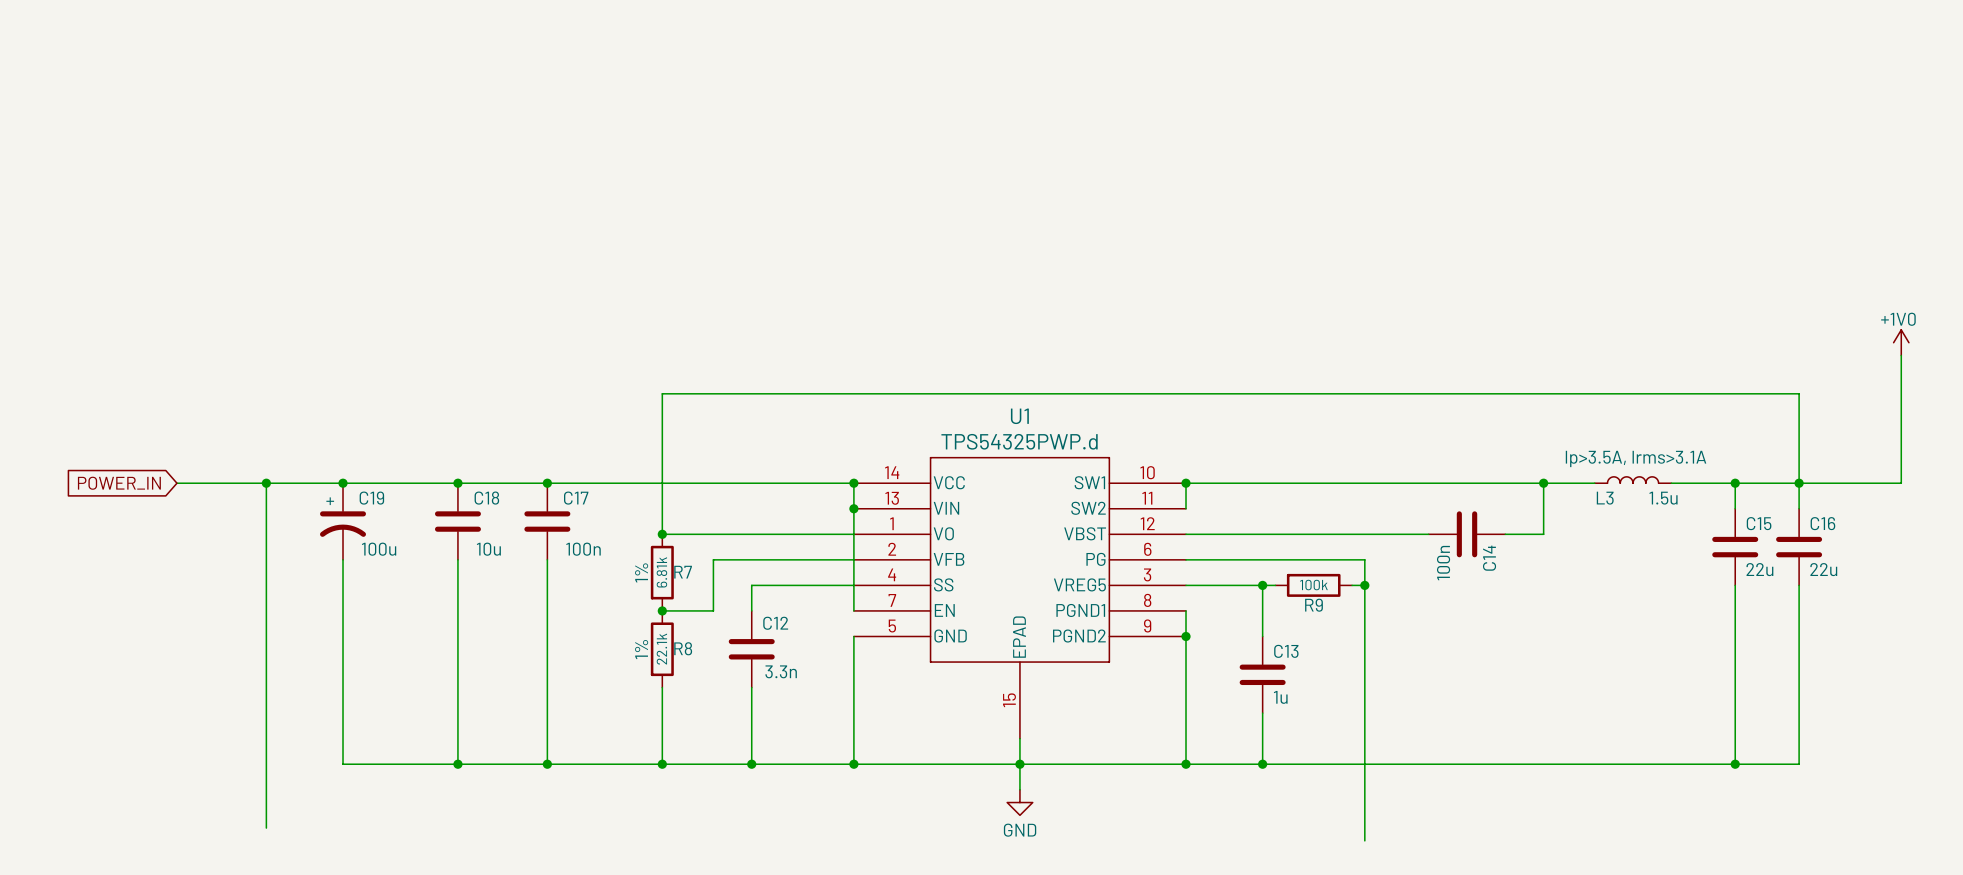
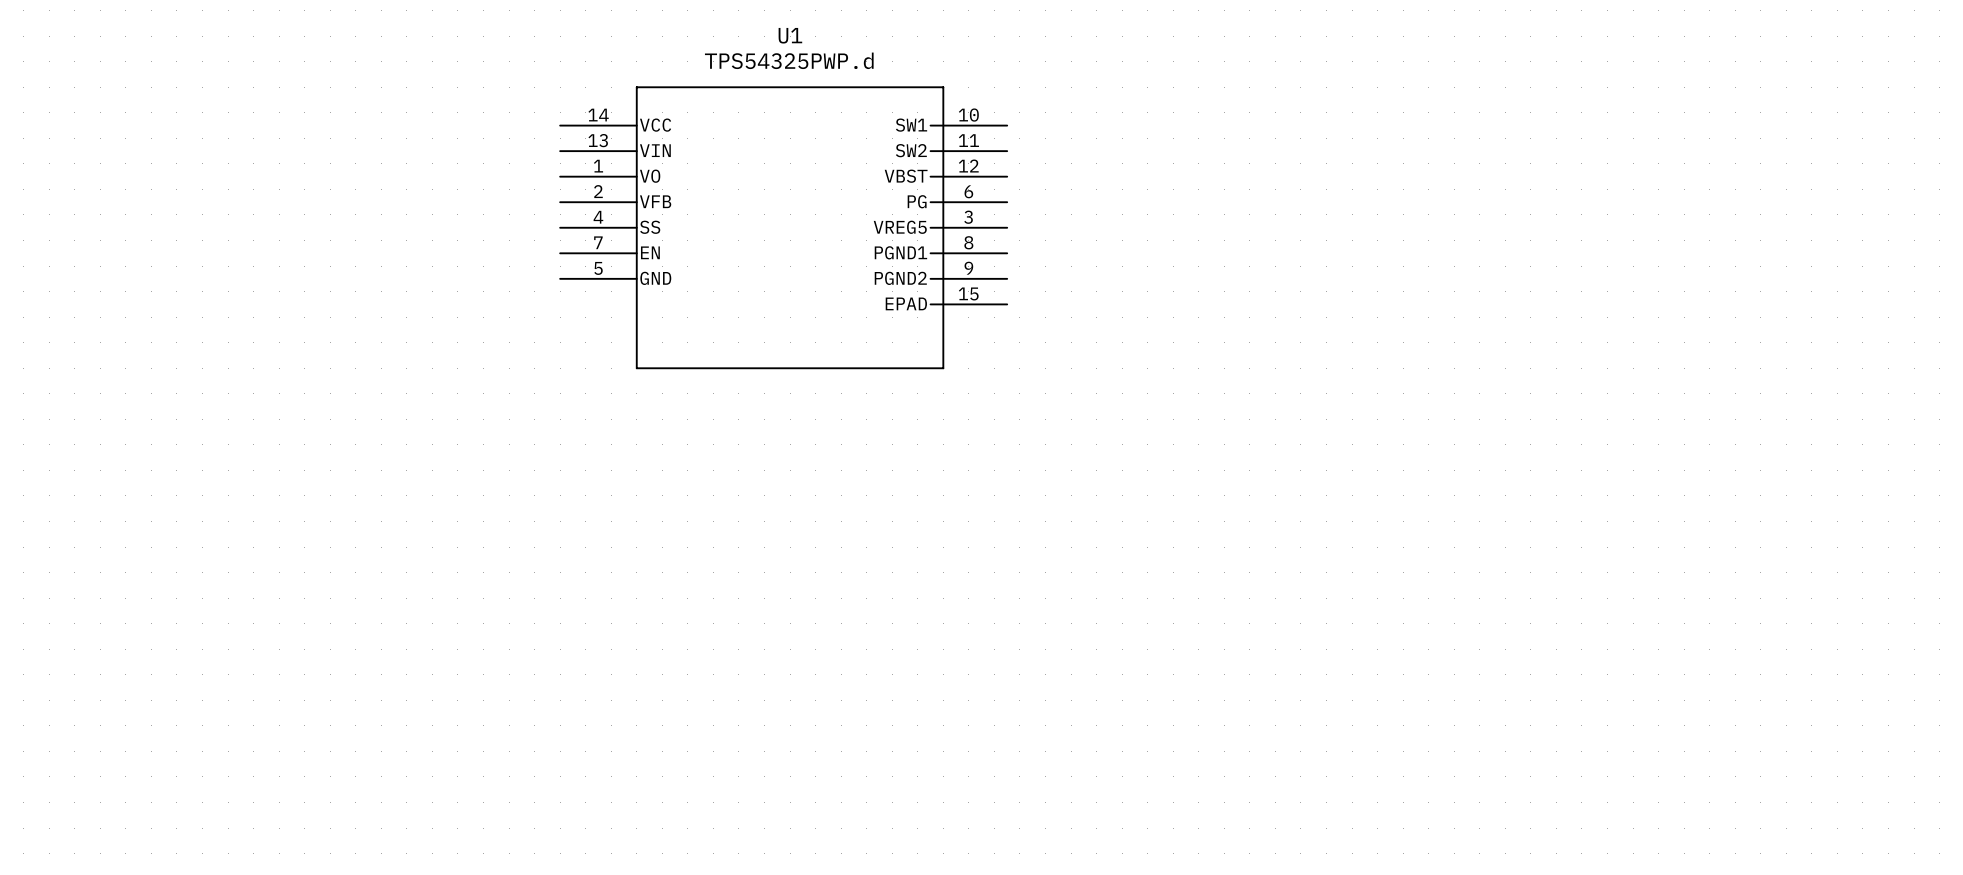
power symbol: +1V0 (1901, 342) -> none
wire: (1901, 355) (1901, 483) (1671, 483) -> none
U1 symbol: [853, 457, 1187, 739] -> [560, 86, 1008, 369]
L3: 1.5u (1633, 480) -> none
global label: POWER_IN (119, 483) -> none
wire: (176, 483) (853, 483) (853, 610) -> none
wire: (266, 483) (266, 828) -> none
junction: (266, 483) -> none
junction: (343, 483) -> none
junction: (457, 483) -> none
junction: (547, 483) -> none
junction: (853, 483) -> none
junction: (1186, 483) -> none
wire: (1543, 483) (1543, 534) (1505, 534) -> none
junction: (1543, 483) -> none
wire: (1594, 483) (1186, 483) (1186, 508) -> none
wire: (1735, 483) (1735, 508) -> none
junction: (1735, 483) -> none
junction: (1799, 483) -> none
junction: (853, 508) -> none
wire: (1799, 508) (1799, 393) (662, 393) (662, 534) (853, 534) -> none
C19: 100u (343, 521) -> none
C18: 10u (457, 521) -> none
C17: 100n (547, 521) -> none
junction: (662, 534) -> none
wire: (1186, 534) (1428, 534) -> none
C14: 100n (1467, 534) -> none
C15: 22u (1735, 547) -> none
C16: 22u (1799, 547) -> none
wire: (343, 559) (343, 764) (1799, 764) (1799, 585) -> none
wire: (457, 559) (457, 764) -> none
wire: (547, 559) (547, 764) -> none
wire: (853, 559) (713, 559) (713, 610) (662, 610) -> none
wire: (1186, 559) (1364, 559) (1364, 840) -> none
R7: 6.81k (662, 572) -> none
wire: (853, 585) (751, 585) (751, 610) -> none
wire: (1186, 585) (1275, 585) -> none
wire: (1262, 585) (1262, 636) -> none
junction: (1262, 585) -> none
R9: 100k (1313, 585) -> none
wire: (1352, 585) (1364, 585) -> none
junction: (1364, 585) -> none
wire: (1735, 585) (1735, 764) -> none
junction: (662, 610) -> none
wire: (1186, 610) (1186, 764) -> none
wire: (853, 636) (853, 764) -> none
junction: (1186, 636) -> none
R8: 22.1k (662, 649) -> none
C12: 3.3n (751, 649) -> none
C13: 1u (1262, 674) -> none
wire: (662, 687) (662, 764) -> none
wire: (751, 687) (751, 764) -> none
wire: (1262, 713) (1262, 764) -> none
wire: (1019, 738) (1019, 789) -> none
junction: (457, 764) -> none
junction: (547, 764) -> none
junction: (662, 764) -> none
junction: (751, 764) -> none
junction: (853, 764) -> none
junction: (1019, 764) -> none
junction: (1186, 764) -> none
junction: (1262, 764) -> none
junction: (1735, 764) -> none
power symbol: GND (1019, 802) -> none

